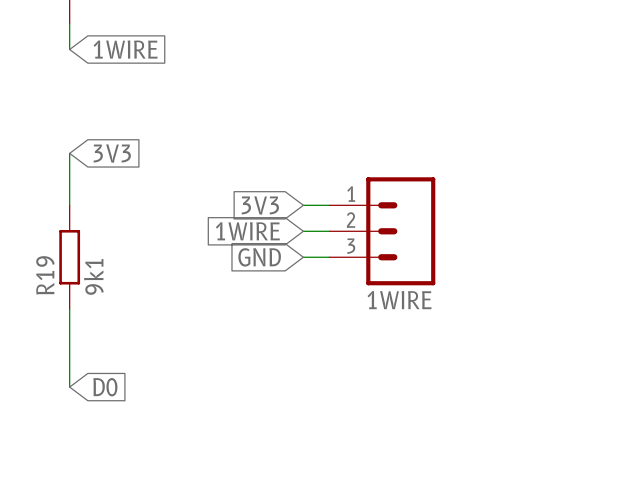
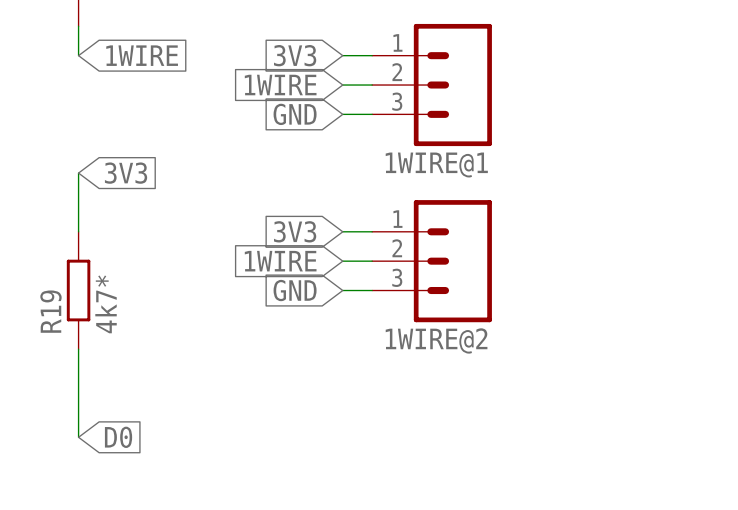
global label: none -> 3V3 (295, 55)
wire: none -> (342, 55) (372, 55)
global label: none -> 1WIRE (280, 85)
wire: none -> (342, 85) (372, 85)
1WIRE@1: none -> (432, 85)
global label: none -> GND (295, 114)
wire: none -> (342, 114) (372, 114)
R19 value: 9k1 (93, 276) -> 4k7* (106, 304)
1WIRE name: 1WIRE (399, 300) -> 1WIRE@2 (436, 340)

